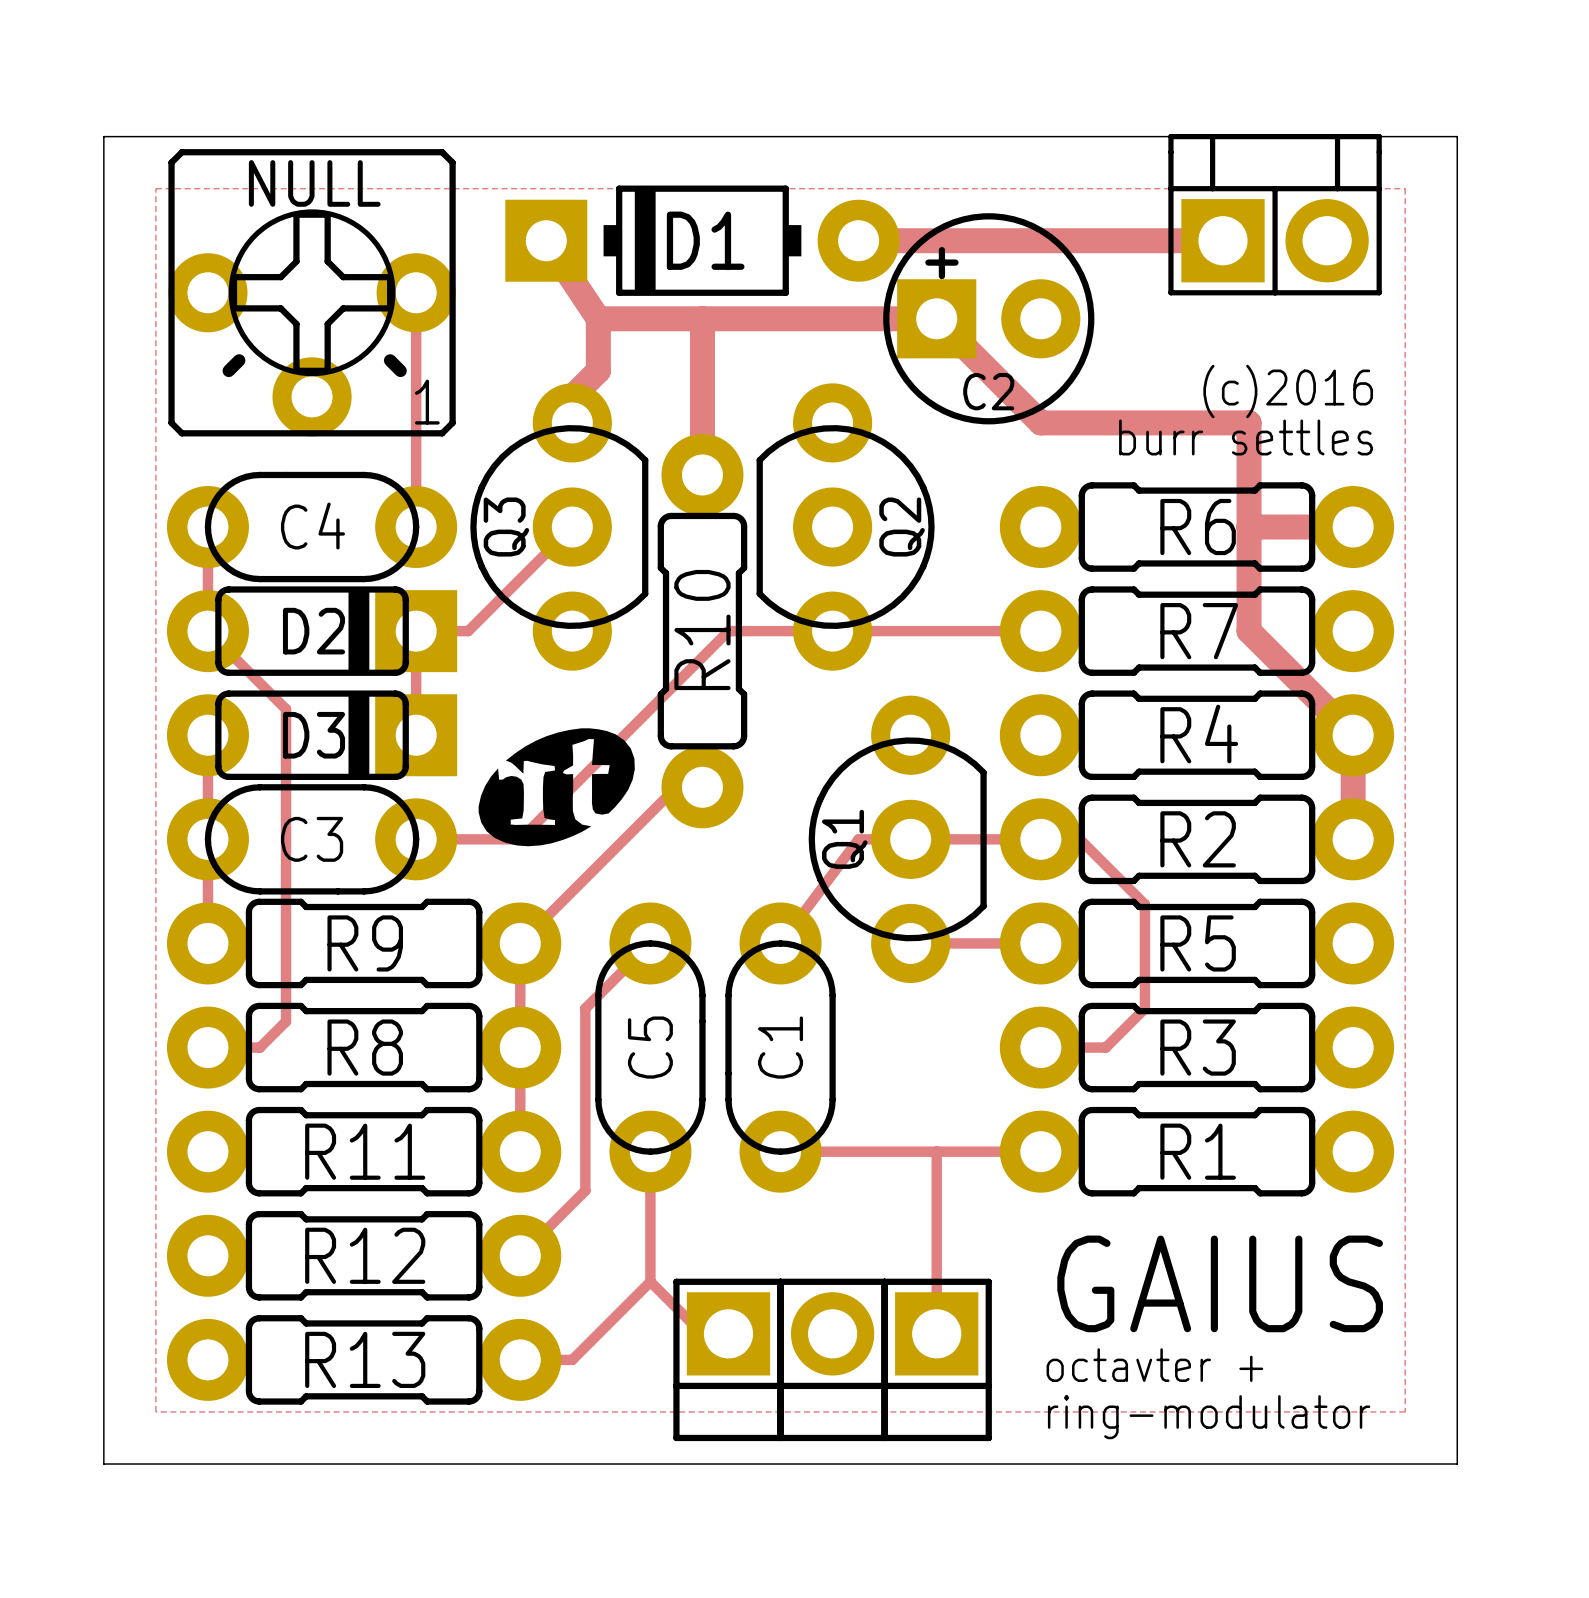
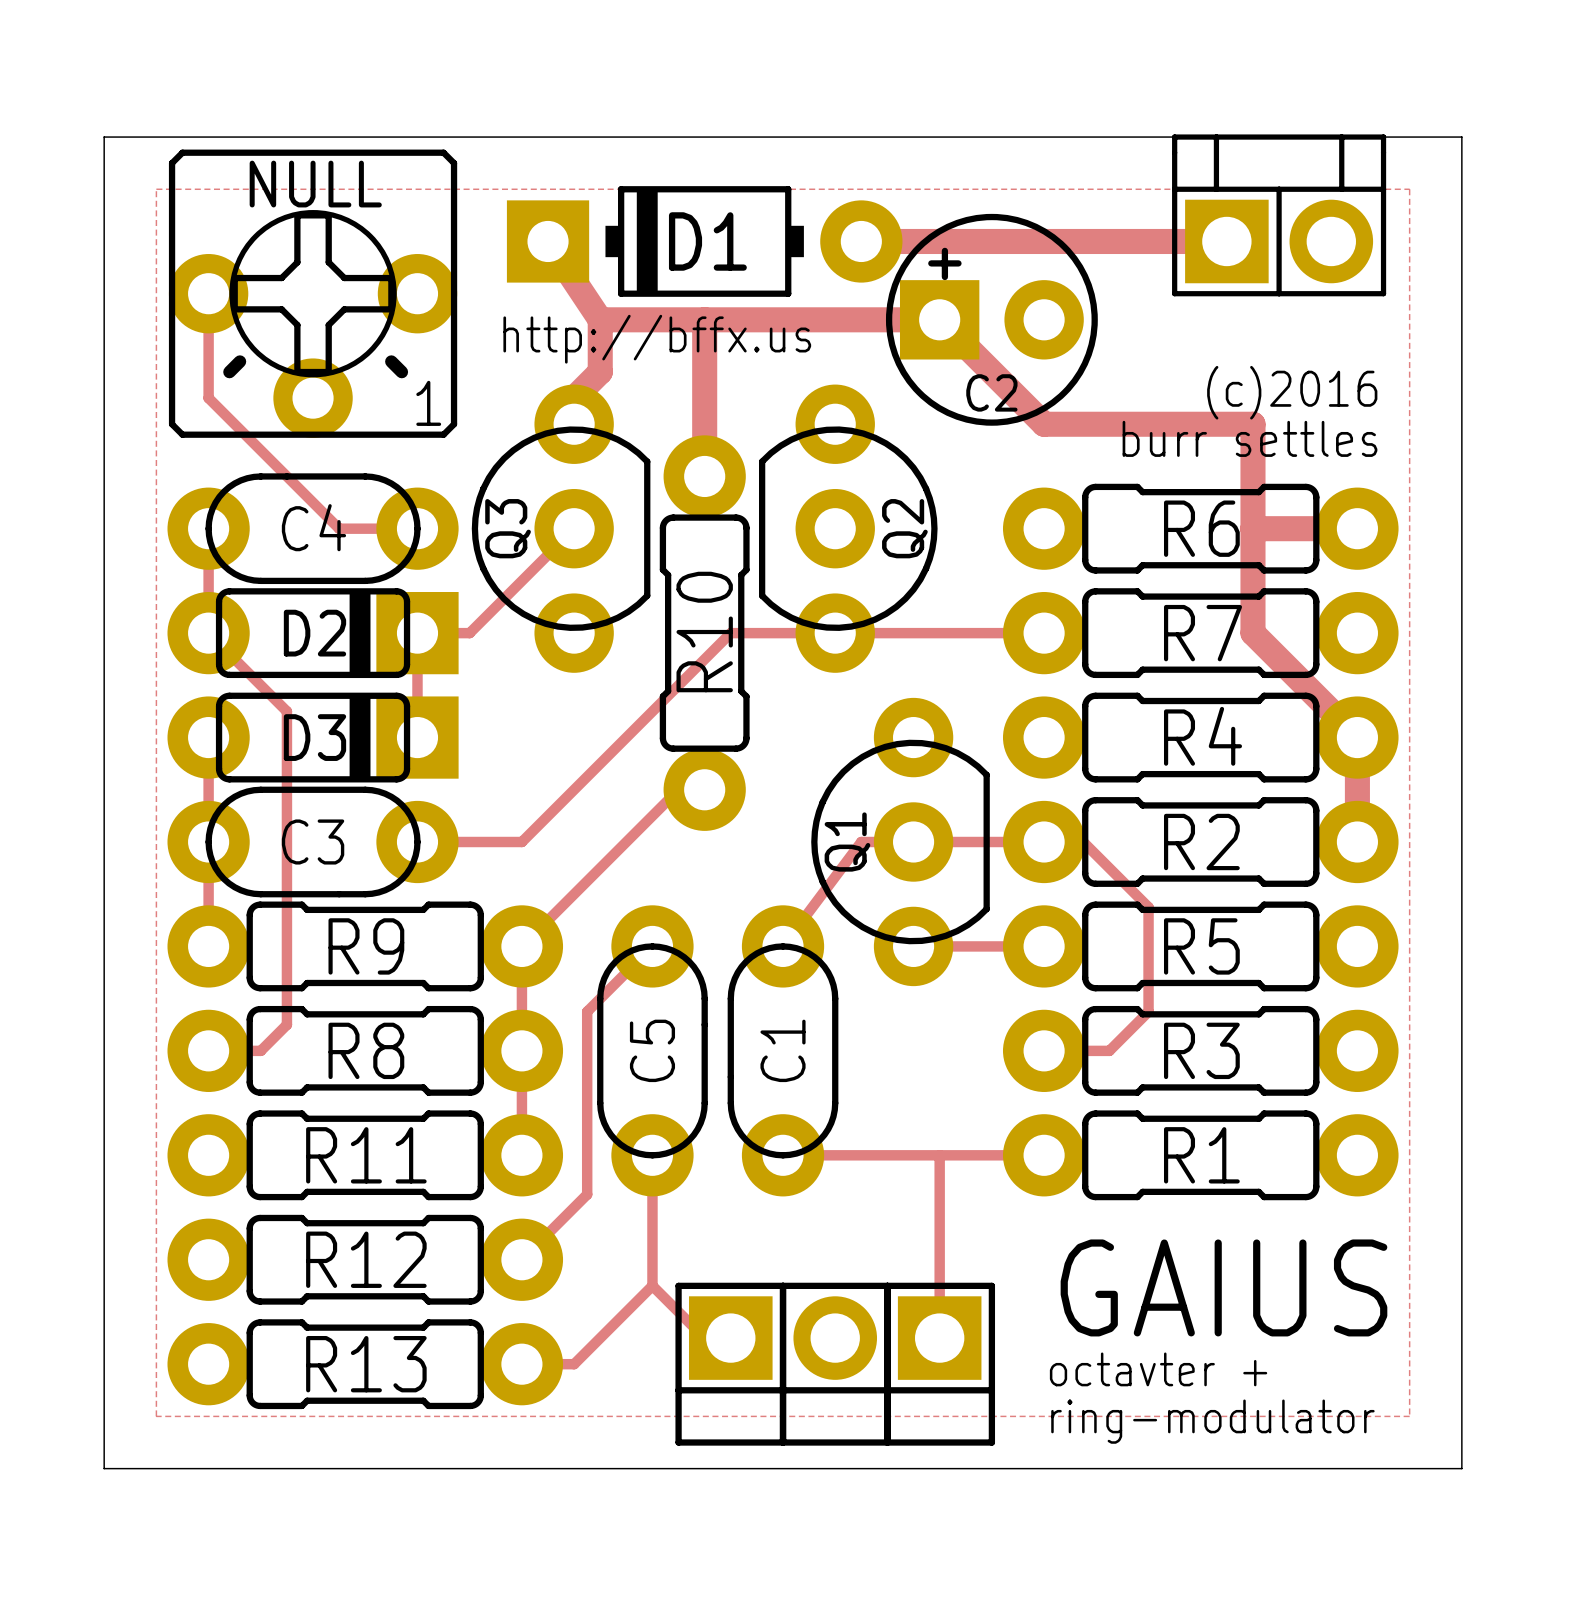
track: (416, 292) (416, 527) -> (208, 293) (208, 398) (339, 528) (417, 528)
text: none -> http://bffx.us (657, 339)
drawing: [478, 728, 635, 847] -> none

